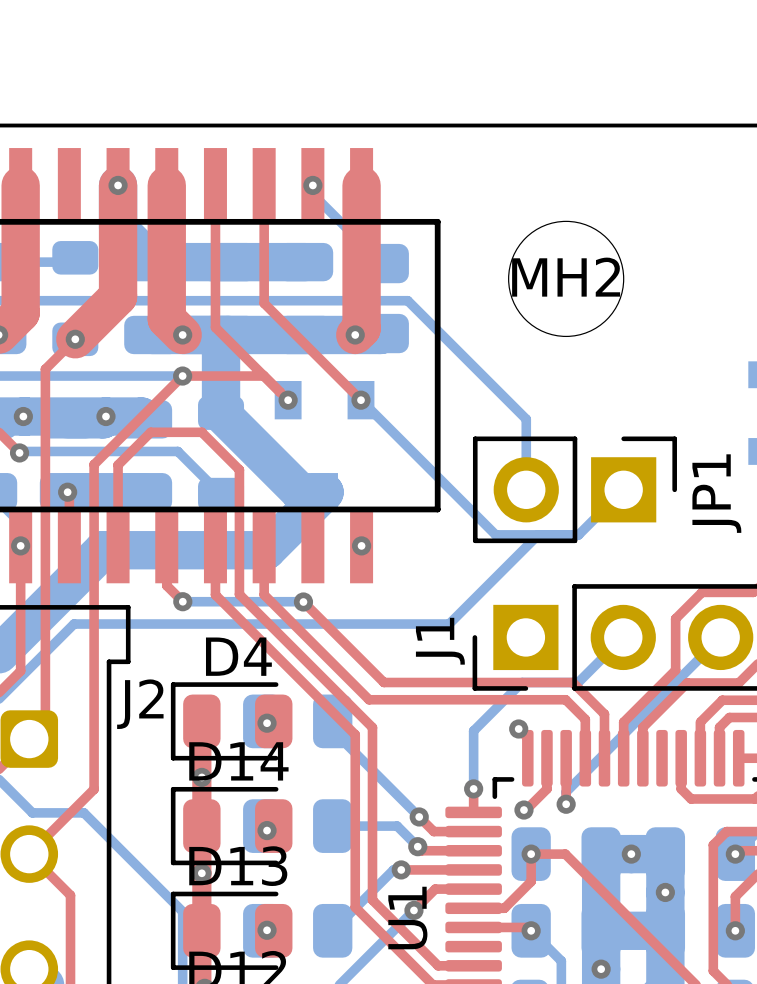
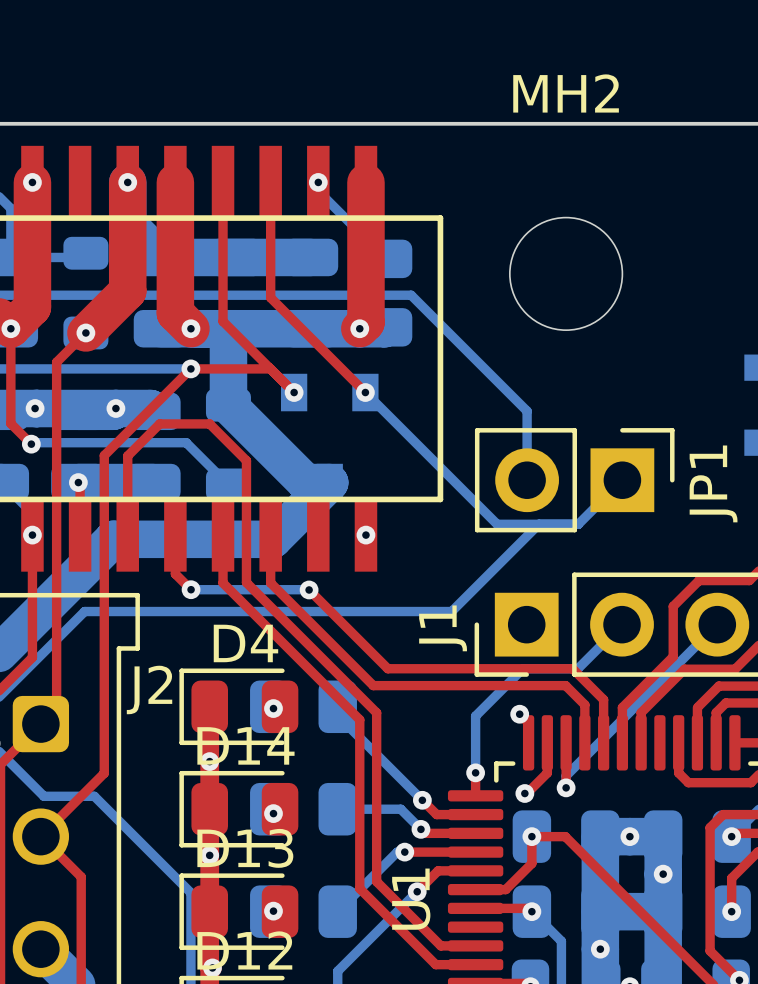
via: none -> (32, 182)
MH2 name position: MH2 (566, 277) -> MH2 (566, 93)

